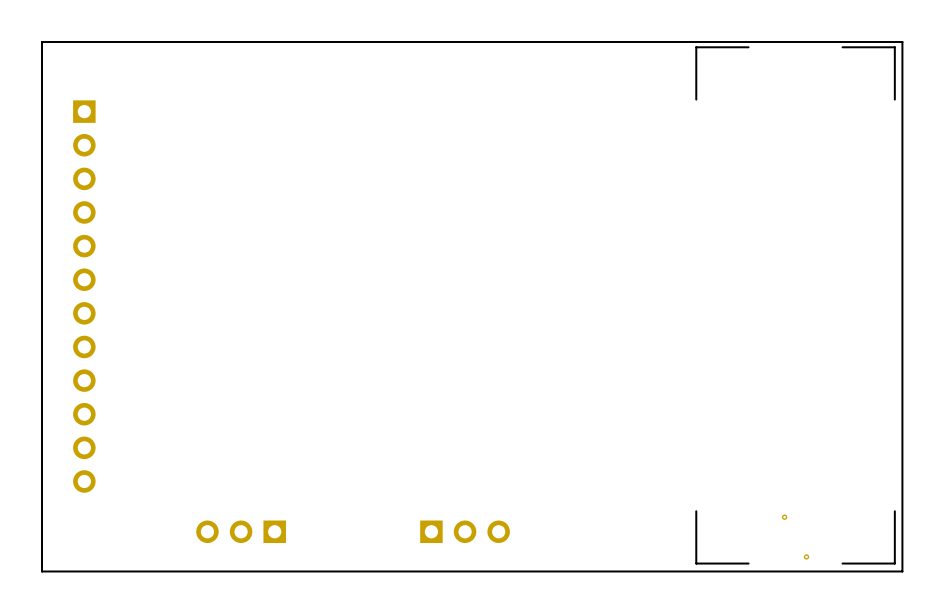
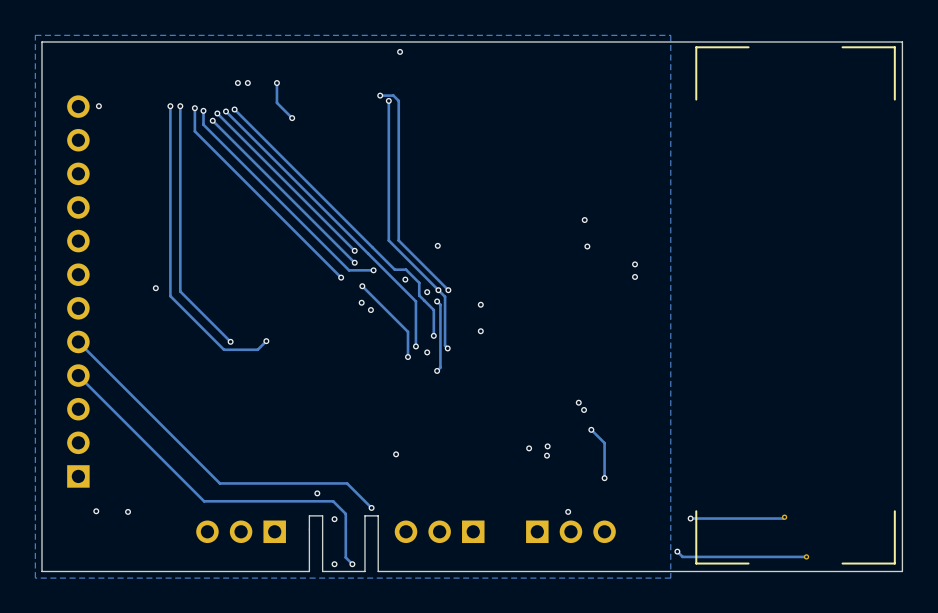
zone outline: none -> (670, 35) (35, 35) (35, 578) (670, 578) (670, 35)
via: none -> (400, 51)
via: none -> (237, 83)
via: none -> (247, 83)
track: none -> (276, 83) (276, 102) (292, 118)
via: none -> (276, 83)
track: none -> (380, 95) (393, 95) (398, 100) (398, 240) (448, 290)
via: none -> (380, 95)
track: none -> (388, 100) (388, 240) (445, 296) (445, 345) (447, 348)
via: none -> (388, 100)
via: none -> (98, 106)
track: none -> (170, 106) (170, 296) (224, 349) (257, 349) (266, 341)
via: none -> (170, 106)
track: none -> (180, 106) (180, 291) (230, 341)
via: none -> (180, 106)
track: none -> (194, 108) (194, 131) (341, 277)
via: none -> (194, 108)
track: none -> (234, 109) (394, 269) (406, 269) (419, 282) (419, 295) (433, 310) (433, 335)
via: none -> (234, 109)
track: none -> (203, 110) (203, 124) (349, 270) (373, 270)
via: none -> (203, 110)
track: none -> (225, 111) (415, 301) (415, 346)
via: none -> (225, 111)
track: none -> (217, 113) (354, 250)
via: none -> (217, 113)
via: none -> (292, 118)
track: none -> (212, 120) (354, 262)
via: none -> (212, 120)
via: none -> (584, 220)
via: none -> (437, 245)
via: none -> (587, 246)
via: none -> (354, 250)
via: none -> (354, 262)
via: none -> (635, 264)
via: none -> (373, 270)
via: none -> (635, 276)
via: none -> (341, 277)
via: none -> (405, 279)
track: none -> (362, 286) (408, 331) (408, 357)
via: none -> (362, 286)
via: none -> (155, 288)
via: none -> (438, 290)
via: none -> (448, 290)
via: none -> (427, 292)
part rotation: 0° (84, 296) -> 180° (78, 291)
track: none -> (437, 301) (440, 304) (440, 367) (437, 370)
via: none -> (437, 301)
via: none -> (361, 302)
via: none -> (480, 304)
via: none -> (370, 310)
via: none -> (480, 331)
via: none -> (433, 335)
track: none -> (78, 341) (219, 483) (347, 483) (371, 507)
via: none -> (230, 341)
via: none -> (266, 341)
via: none -> (415, 346)
via: none -> (447, 348)
via: none -> (427, 352)
via: none -> (408, 357)
via: none -> (437, 370)
track: none -> (78, 375) (204, 501) (333, 501) (345, 513) (345, 557) (352, 564)
via: none -> (578, 402)
via: none -> (584, 409)
track: none -> (591, 429) (604, 443) (604, 478)
via: none -> (591, 429)
via: none -> (547, 446)
via: none -> (529, 448)
via: none -> (396, 454)
via: none -> (546, 455)
via: none -> (604, 478)
via: none -> (317, 493)
via: none -> (371, 507)
via: none -> (96, 511)
via: none -> (128, 511)
via: none -> (568, 511)
track: none -> (784, 517) (690, 518)
via: none -> (690, 518)
via: none -> (334, 519)
part rotation: 0° (465, 531) -> 180° (439, 531)
part: none -> (570, 531)
track: none -> (677, 551) (682, 556) (806, 556)
via: none -> (677, 551)
via: none -> (334, 564)
via: none -> (352, 564)
board edge: (322, 571) (309, 571) -> (322, 571) (322, 515) (309, 515) (309, 571)
board edge: (378, 571) (364, 571) -> (378, 571) (378, 515) (364, 515) (364, 571)

